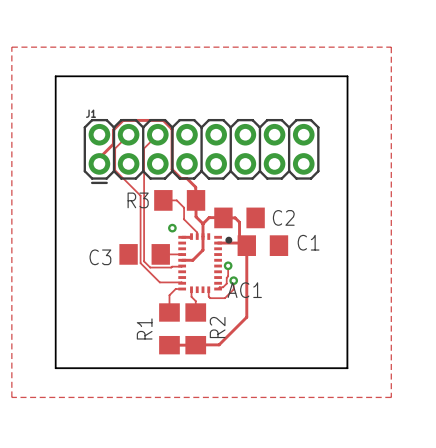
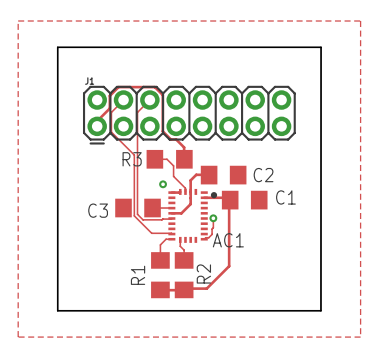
track: (196, 200) (196, 216) (202, 223) -> none
track: (223, 217) (235, 217) (239, 222) (239, 238) (246, 245) (246, 317) (219, 344) (169, 345) -> (229, 200) (229, 266) (206, 288) (160, 289)
track: (233, 280) (233, 289) (224, 298) (210, 298) (208, 289) -> none
via: (233, 280) -> none

